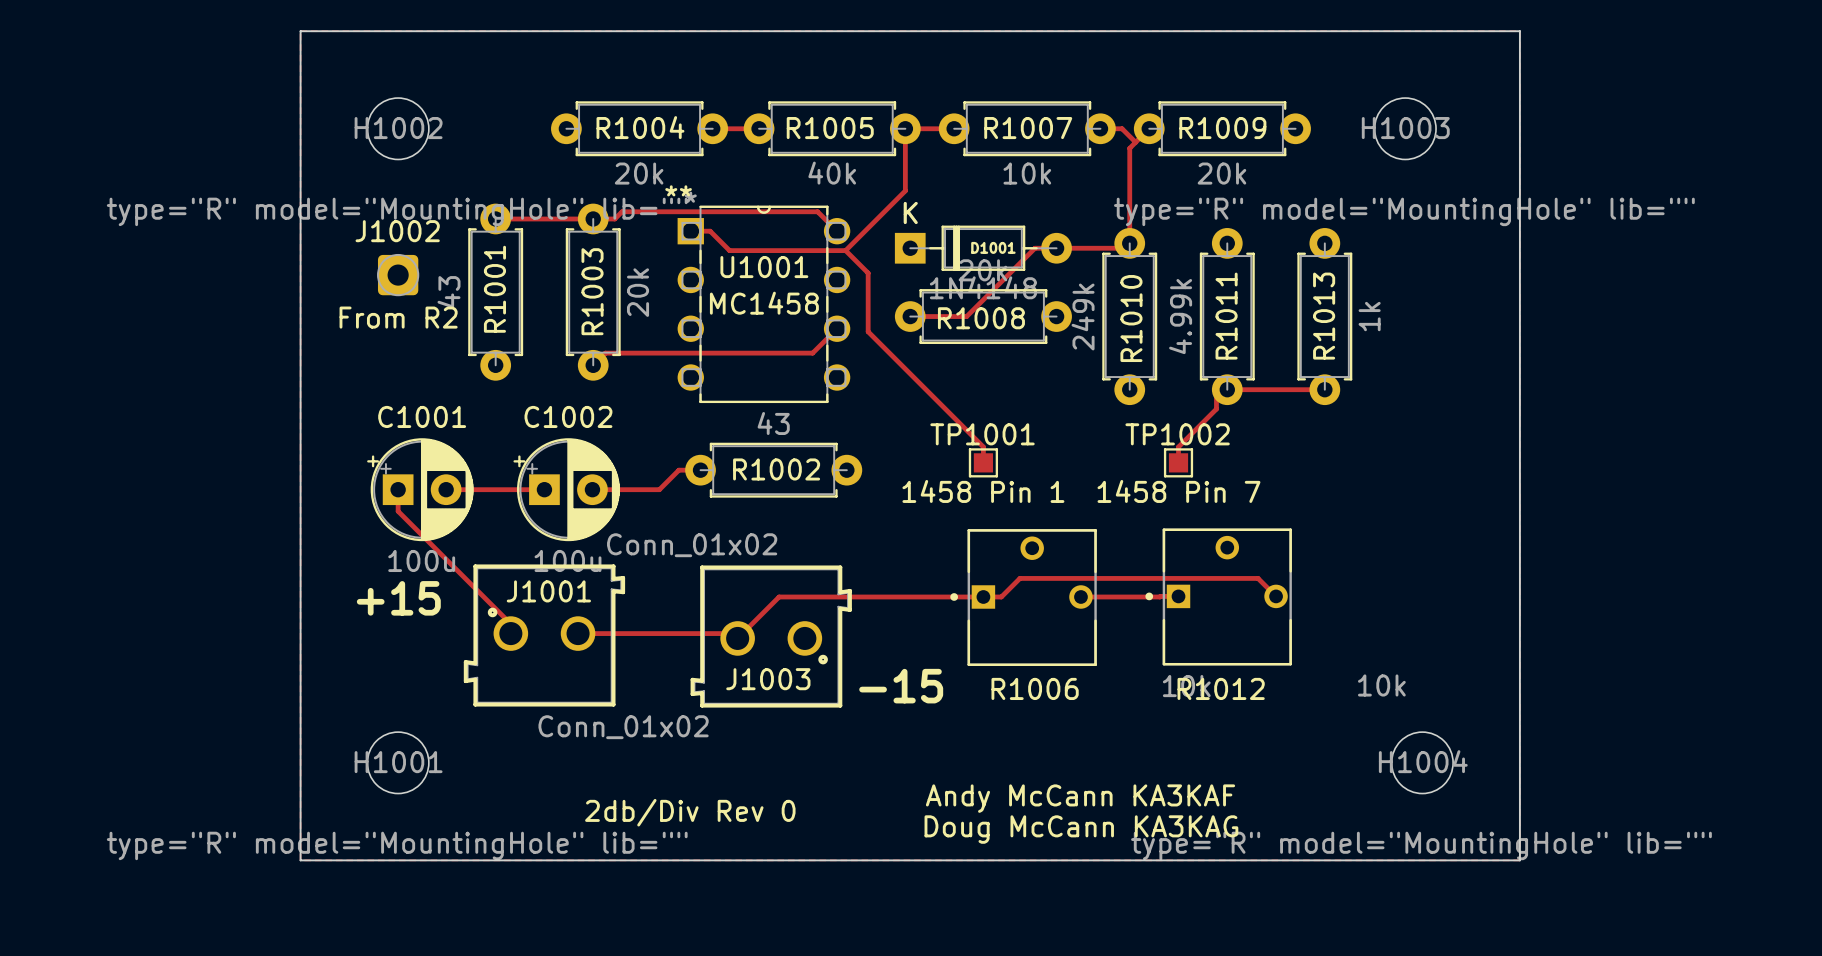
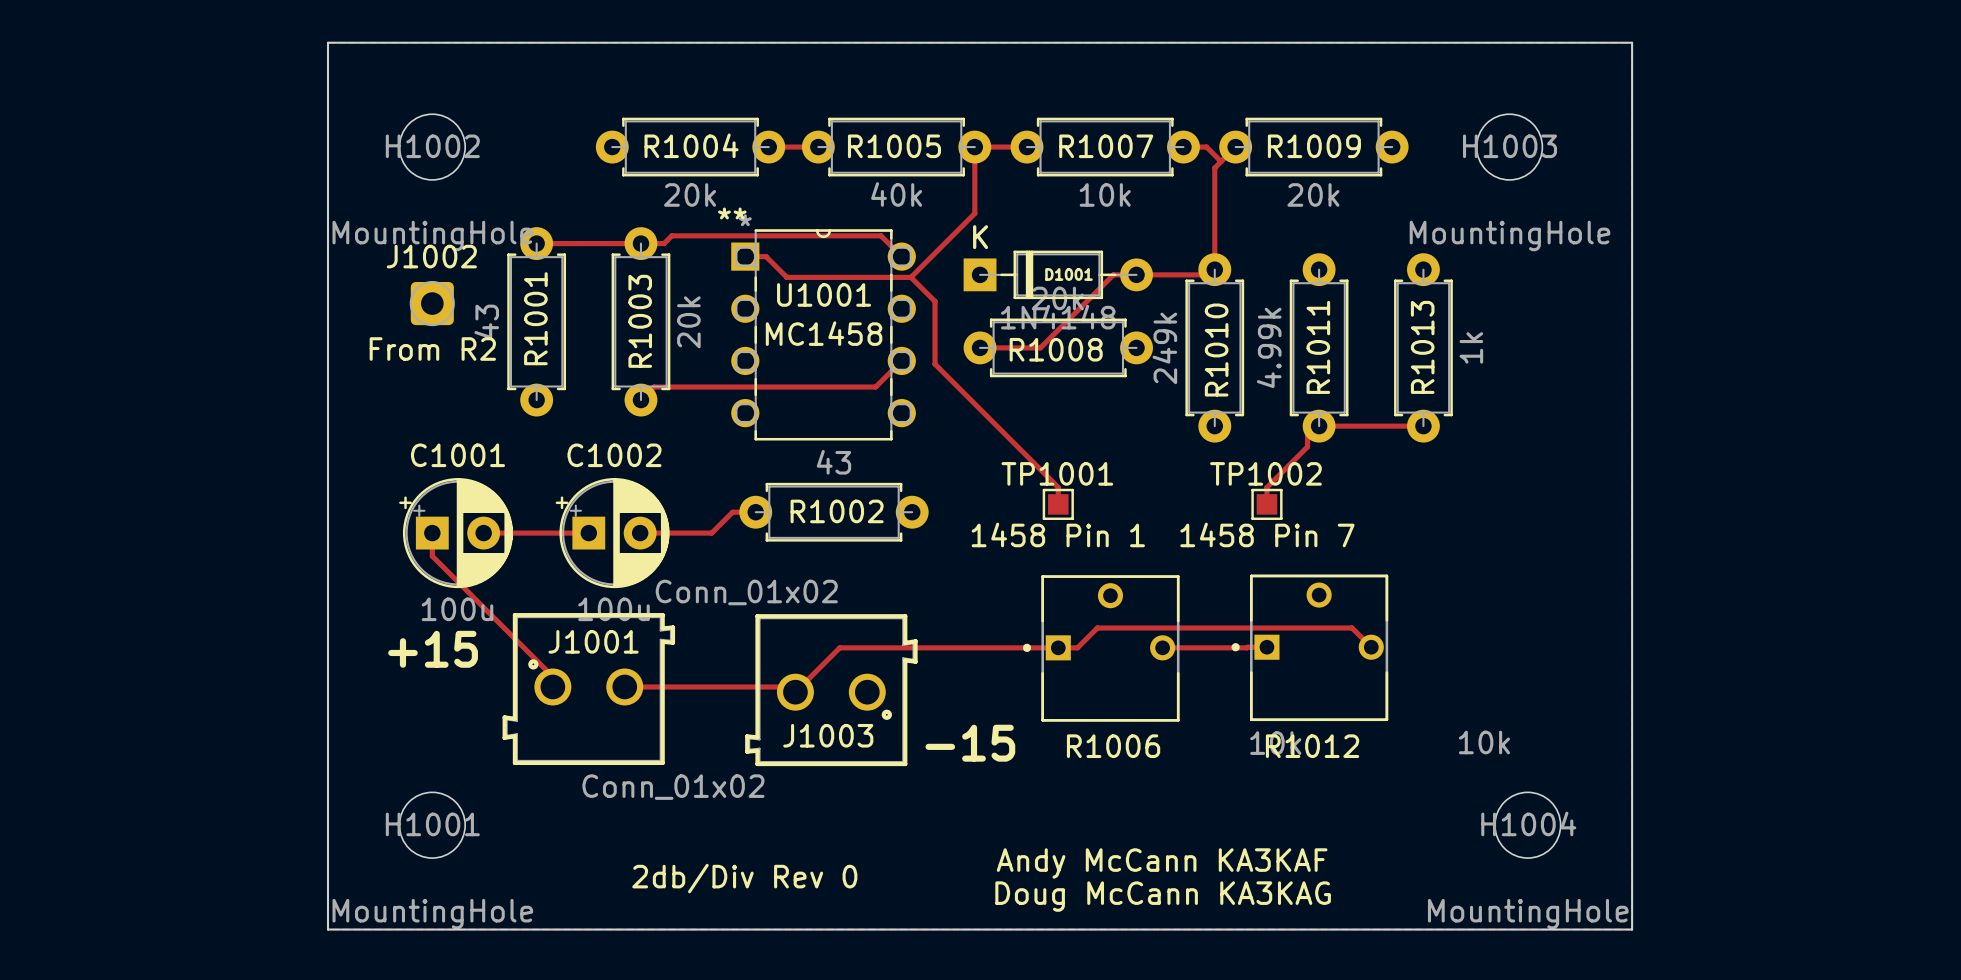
H1002 value: type="R" model="MountingHole" lib="" (397, 211) -> MountingHole (432, 235)
H1003 value: type="R" model="MountingHole" lib="" (1404, 211) -> MountingHole (1510, 235)
H1001 value: type="R" model="MountingHole" lib="" (397, 845) -> MountingHole (432, 914)
H1004 value: type="R" model="MountingHole" lib="" (1421, 845) -> MountingHole (1528, 914)

